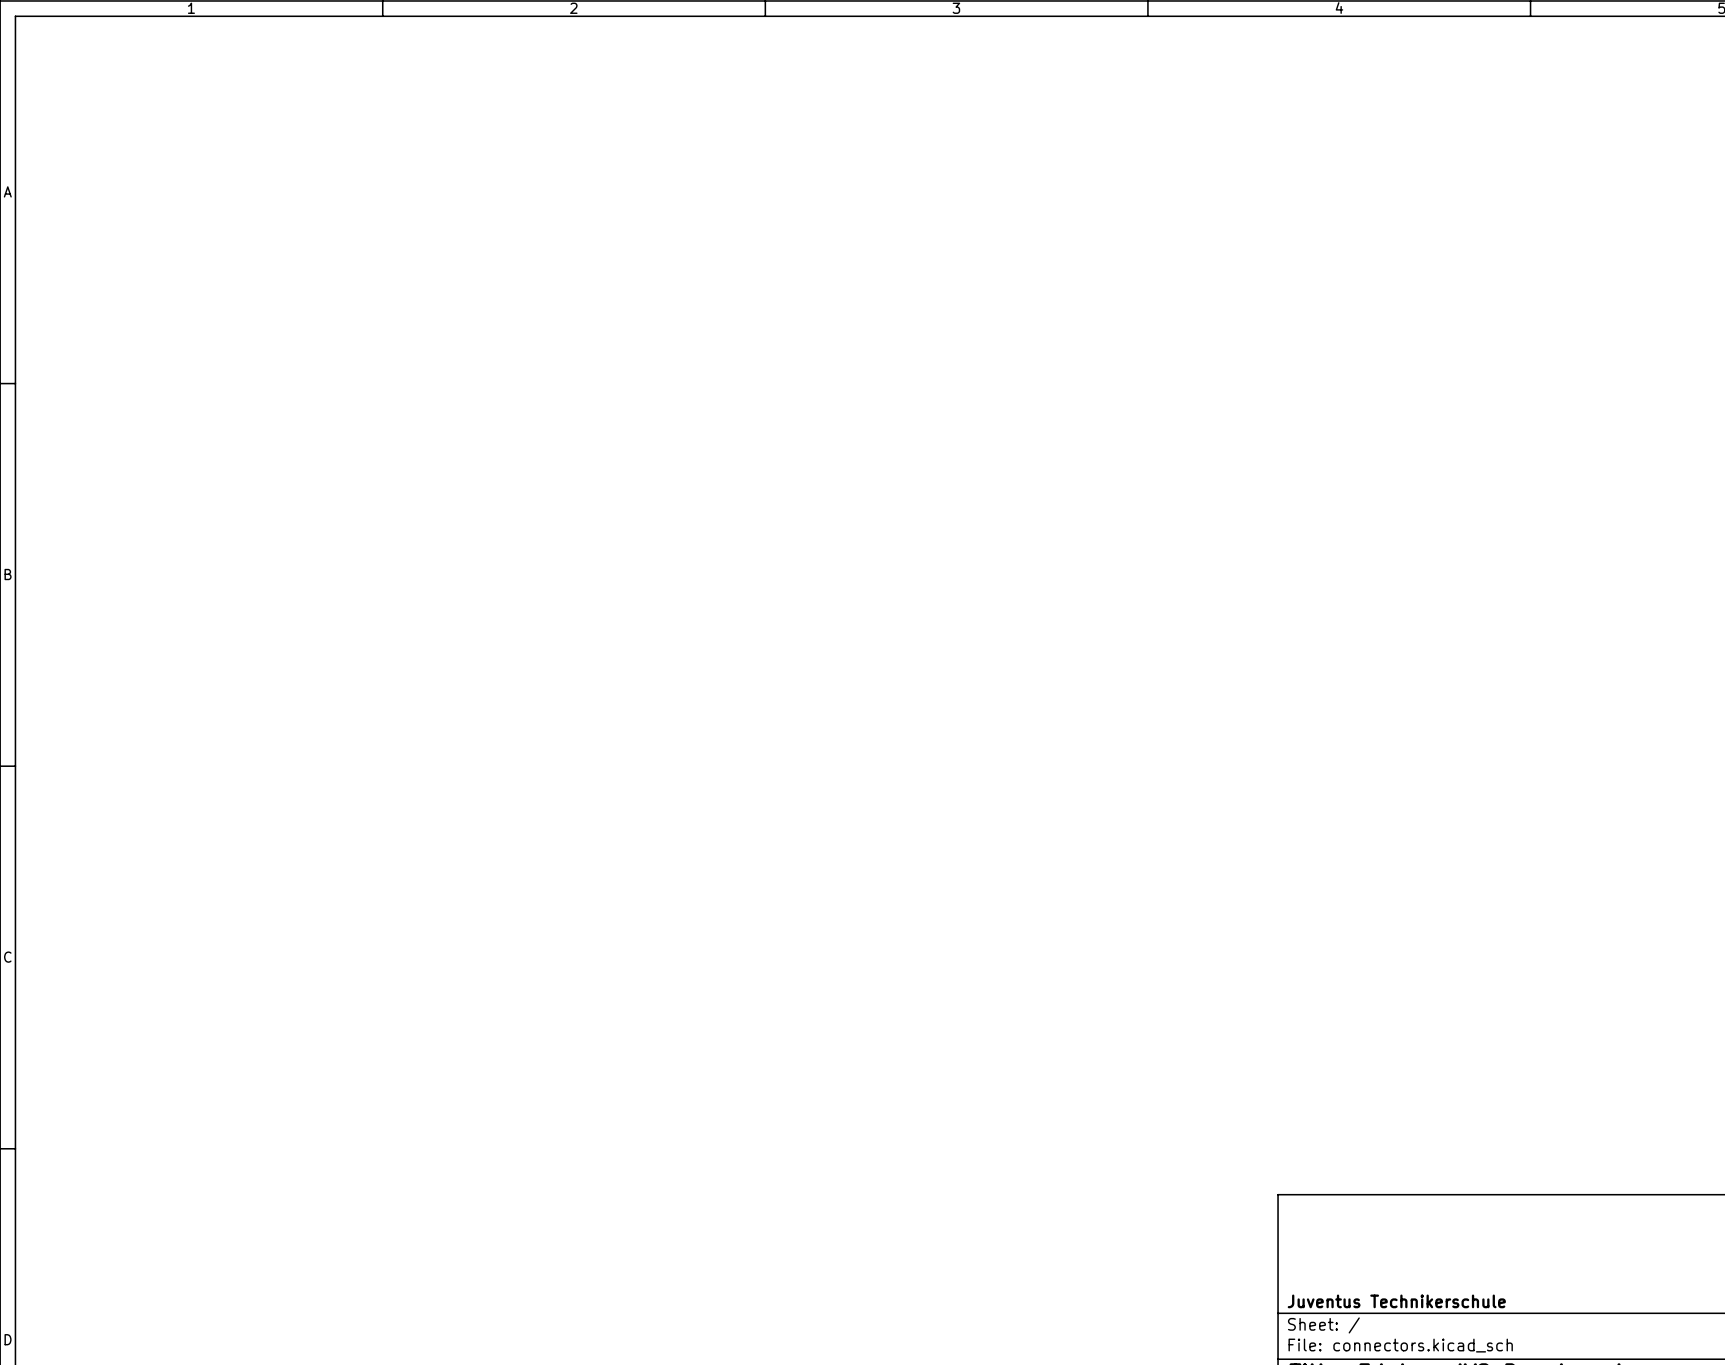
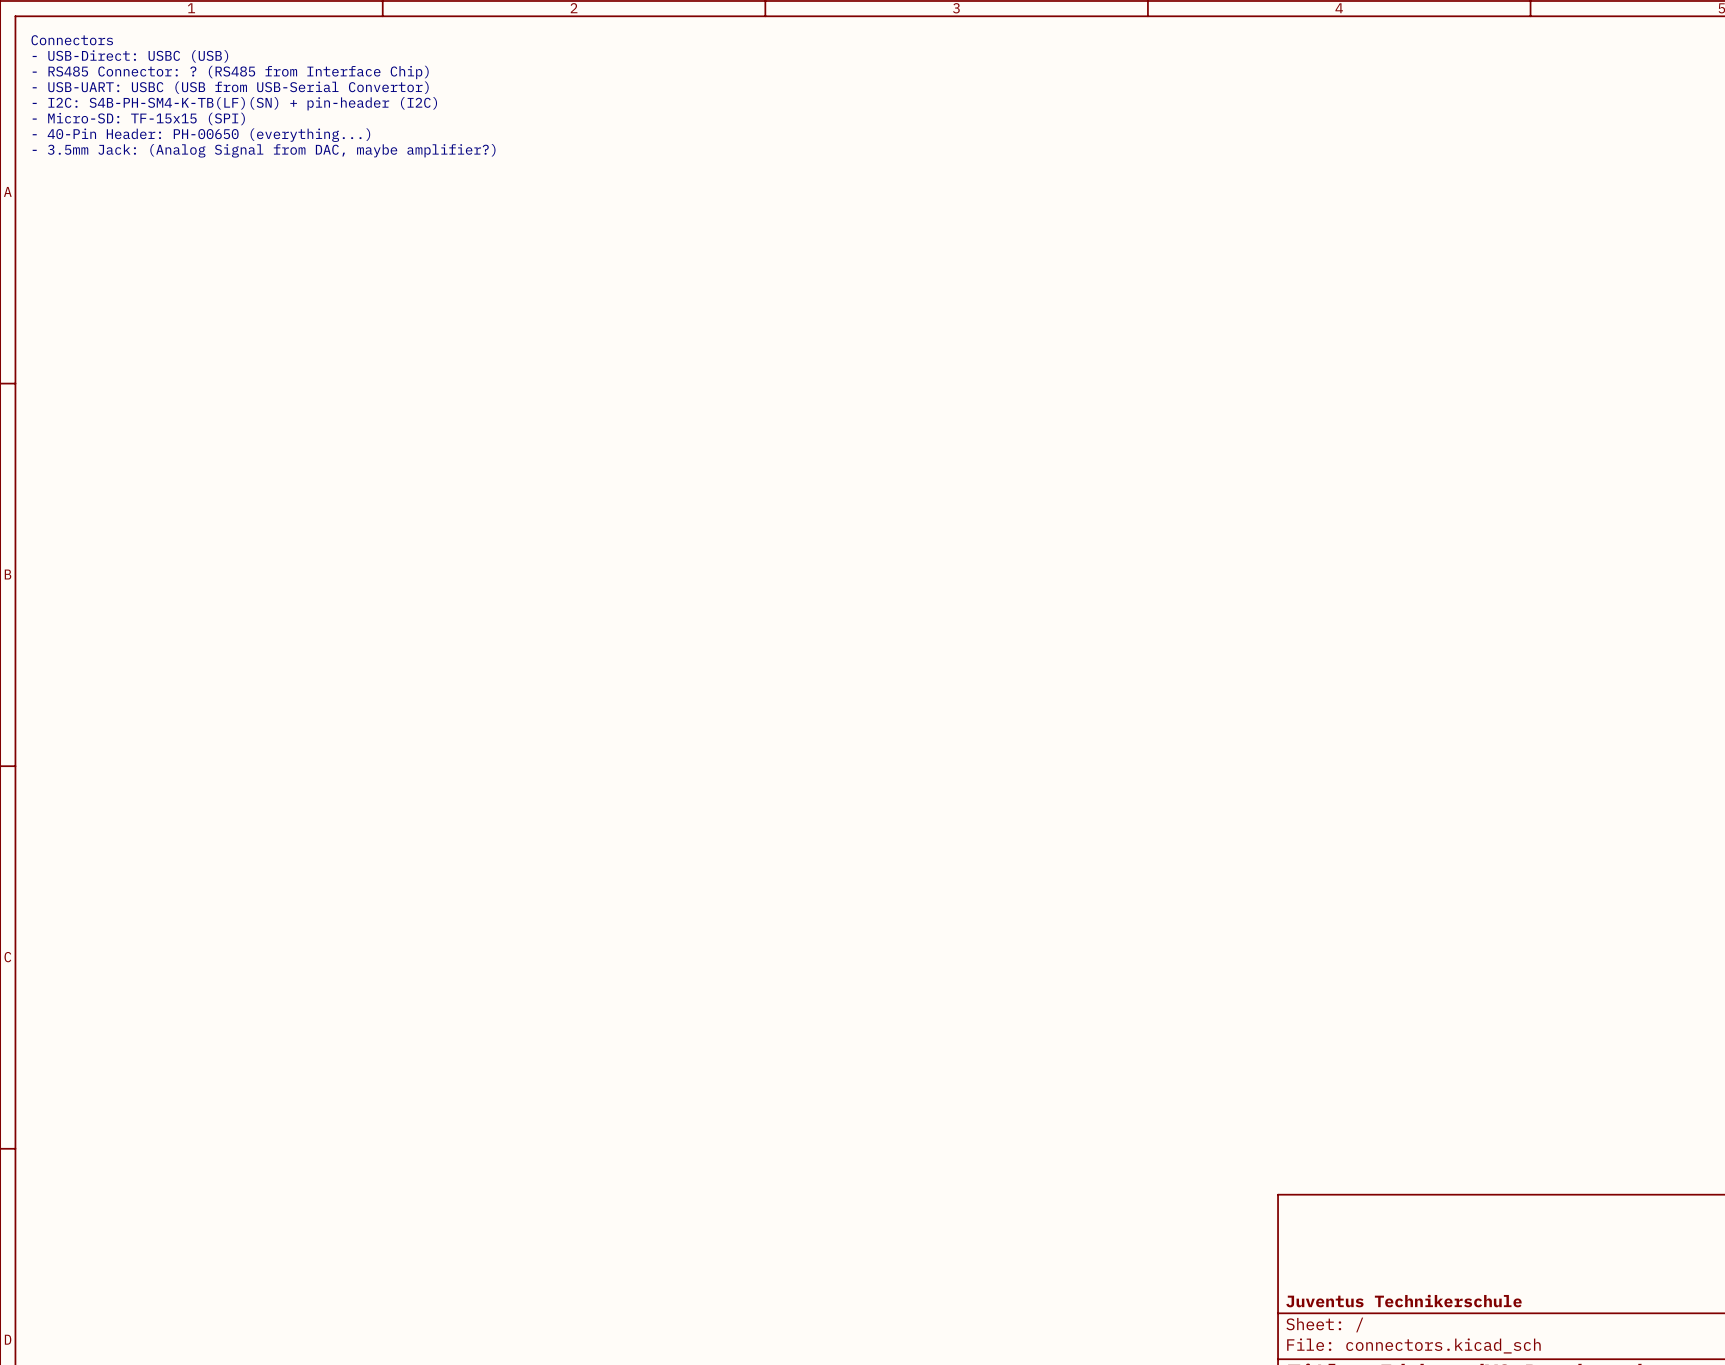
text: none -> Connectors (72, 40)
text: none -> - USB-Direct: USBC (USB) (130, 56)
text: none -> - RS485 Connector: ? (RS485 from Interface Chip) (230, 72)
text: none -> - USB-UART: USBC (USB from USB-Serial Convertor) (230, 87)
text: none -> - I2C: S4B-PH-SM4-K-TB(LF)(SN) + pin-header (I2C) (234, 103)
text: none -> - Micro-SD: TF-15x15 (SPI) (138, 118)
text: none -> - 40-Pin Header: PH-00650 (everything...) (201, 135)
text: none -> - 3.5mm Jack: (Analog Signal from DAC, maybe amplifier?) (264, 150)

